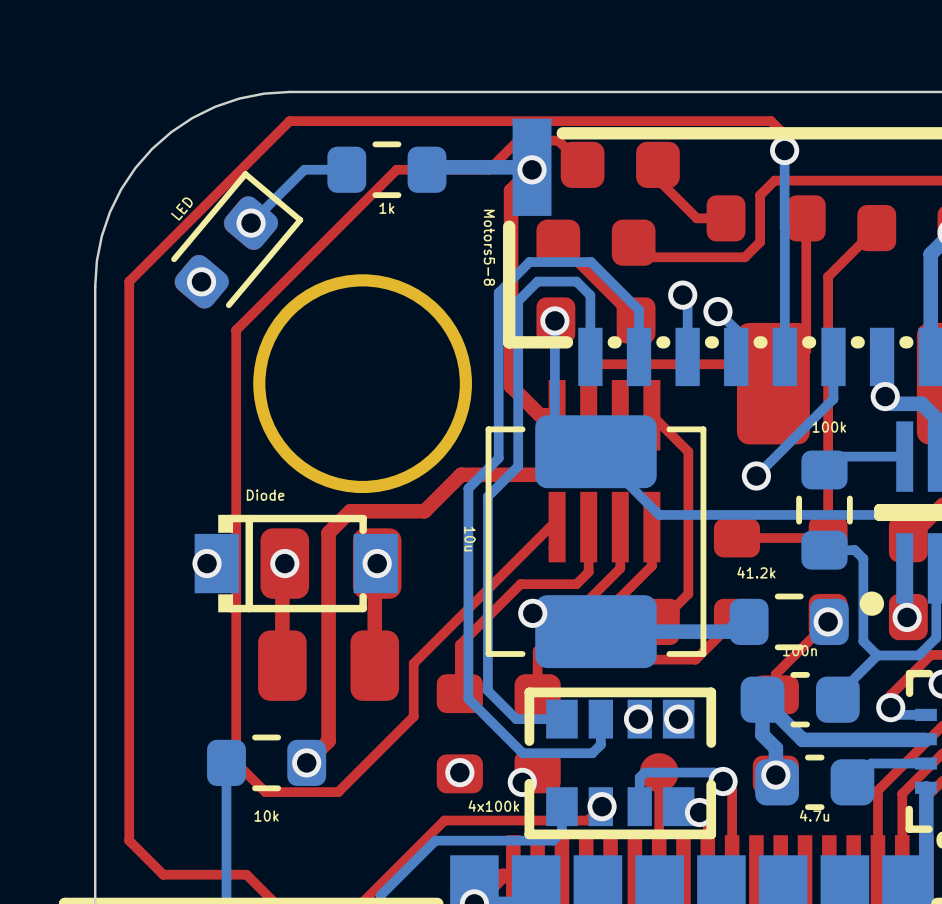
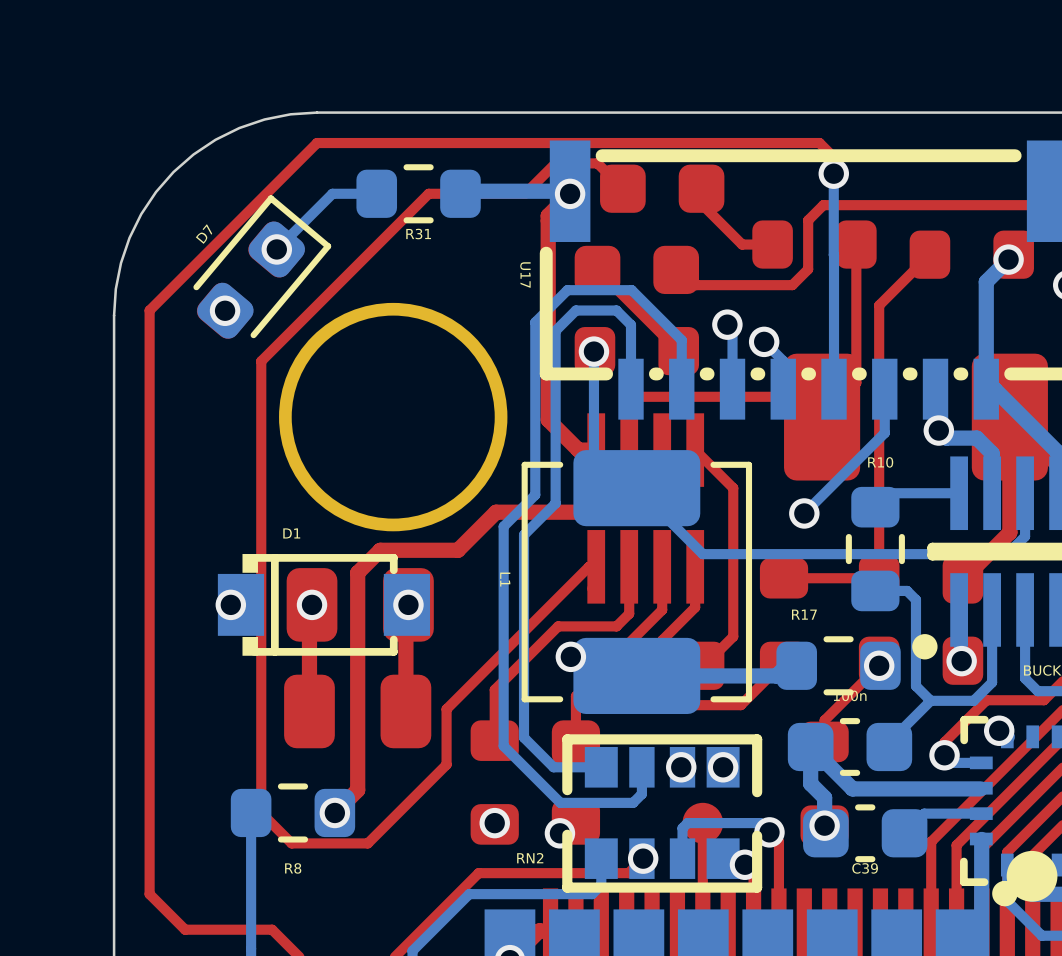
1k name: 1k (386, 208) -> R31 (418, 234)
LED name: LED (181, 209) -> D7 (204, 234)
Motors5-8 name: Motors5-8 (489, 247) -> U17 (525, 275)
100k name: 100k (829, 427) -> R10 (880, 462)
Diode name: Diode (265, 495) -> D1 (291, 533)
10u name: 10u (469, 539) -> L1 (505, 579)
41.2k name: 41.2k (756, 572) -> R17 (804, 614)
4x100k name: 4x100k (493, 806) -> RN2 (530, 858)
4.7u name: 4.7u (814, 815) -> C39 (865, 868)
10k name: 10k (266, 816) -> R8 (293, 868)

